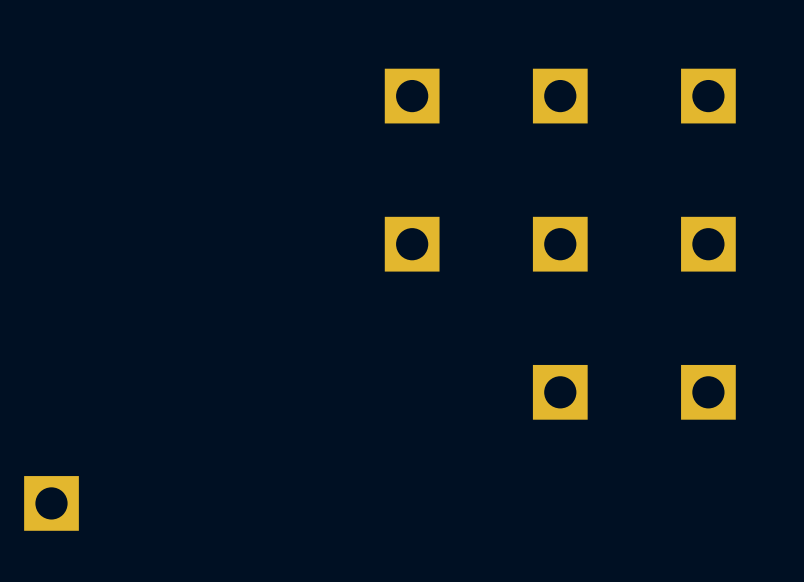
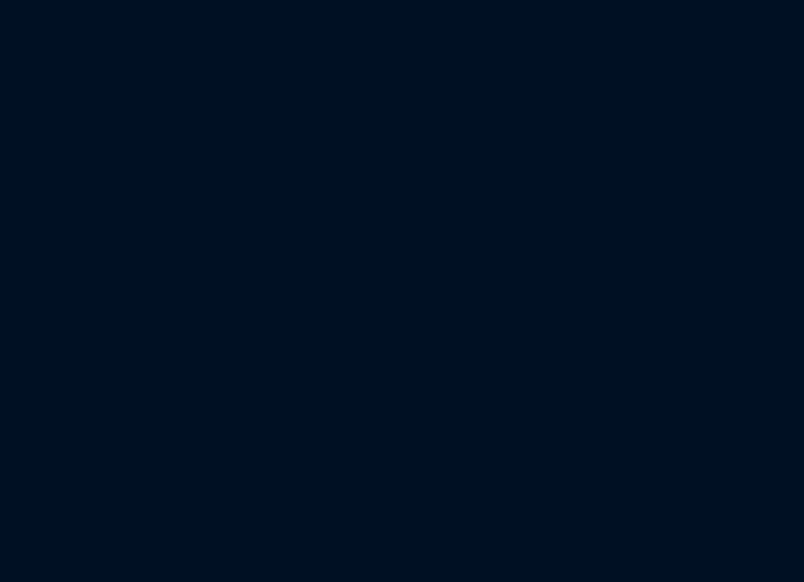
part: (412, 96) -> none
part: (560, 96) -> none
part: (708, 96) -> none
part: (412, 244) -> none
part: (560, 244) -> none
part: (708, 244) -> none
part: (560, 392) -> none
part: (708, 392) -> none
part: (51, 503) -> none

